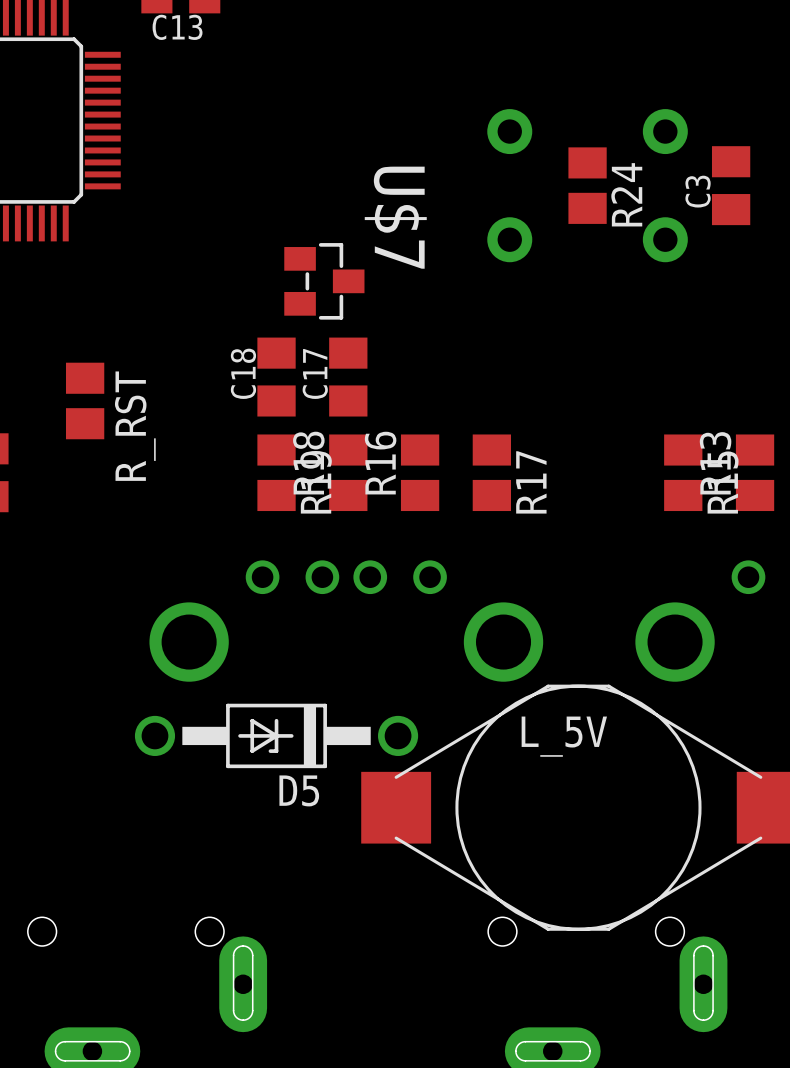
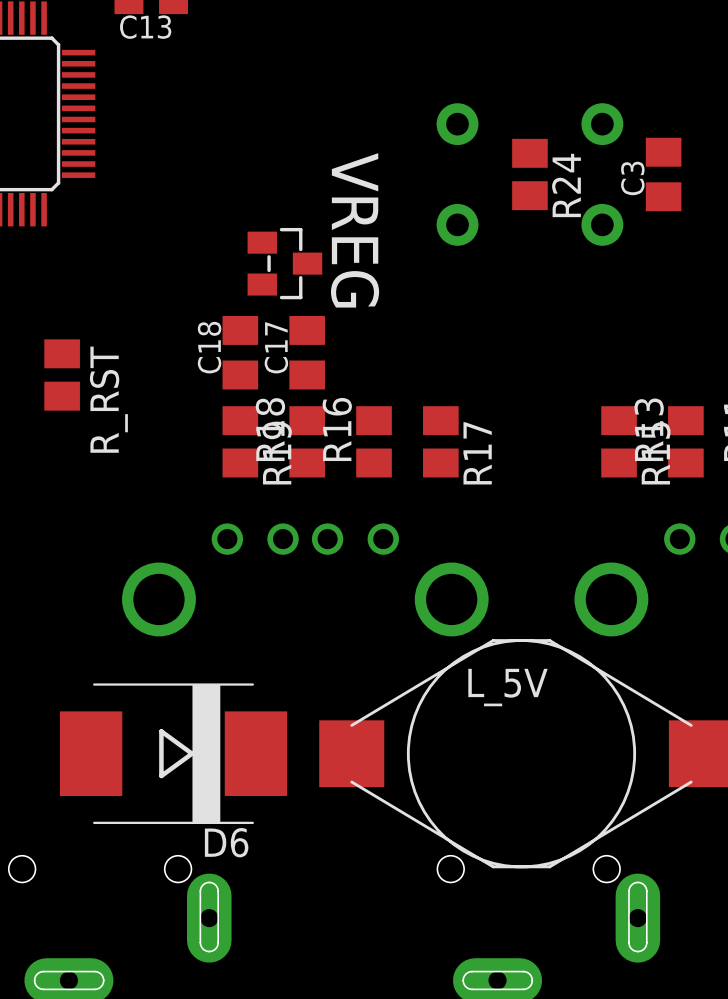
U$7 name: U$7 (395, 217) -> VREG (355, 230)
D5: (276, 735) -> none
D6: none -> (173, 753)

